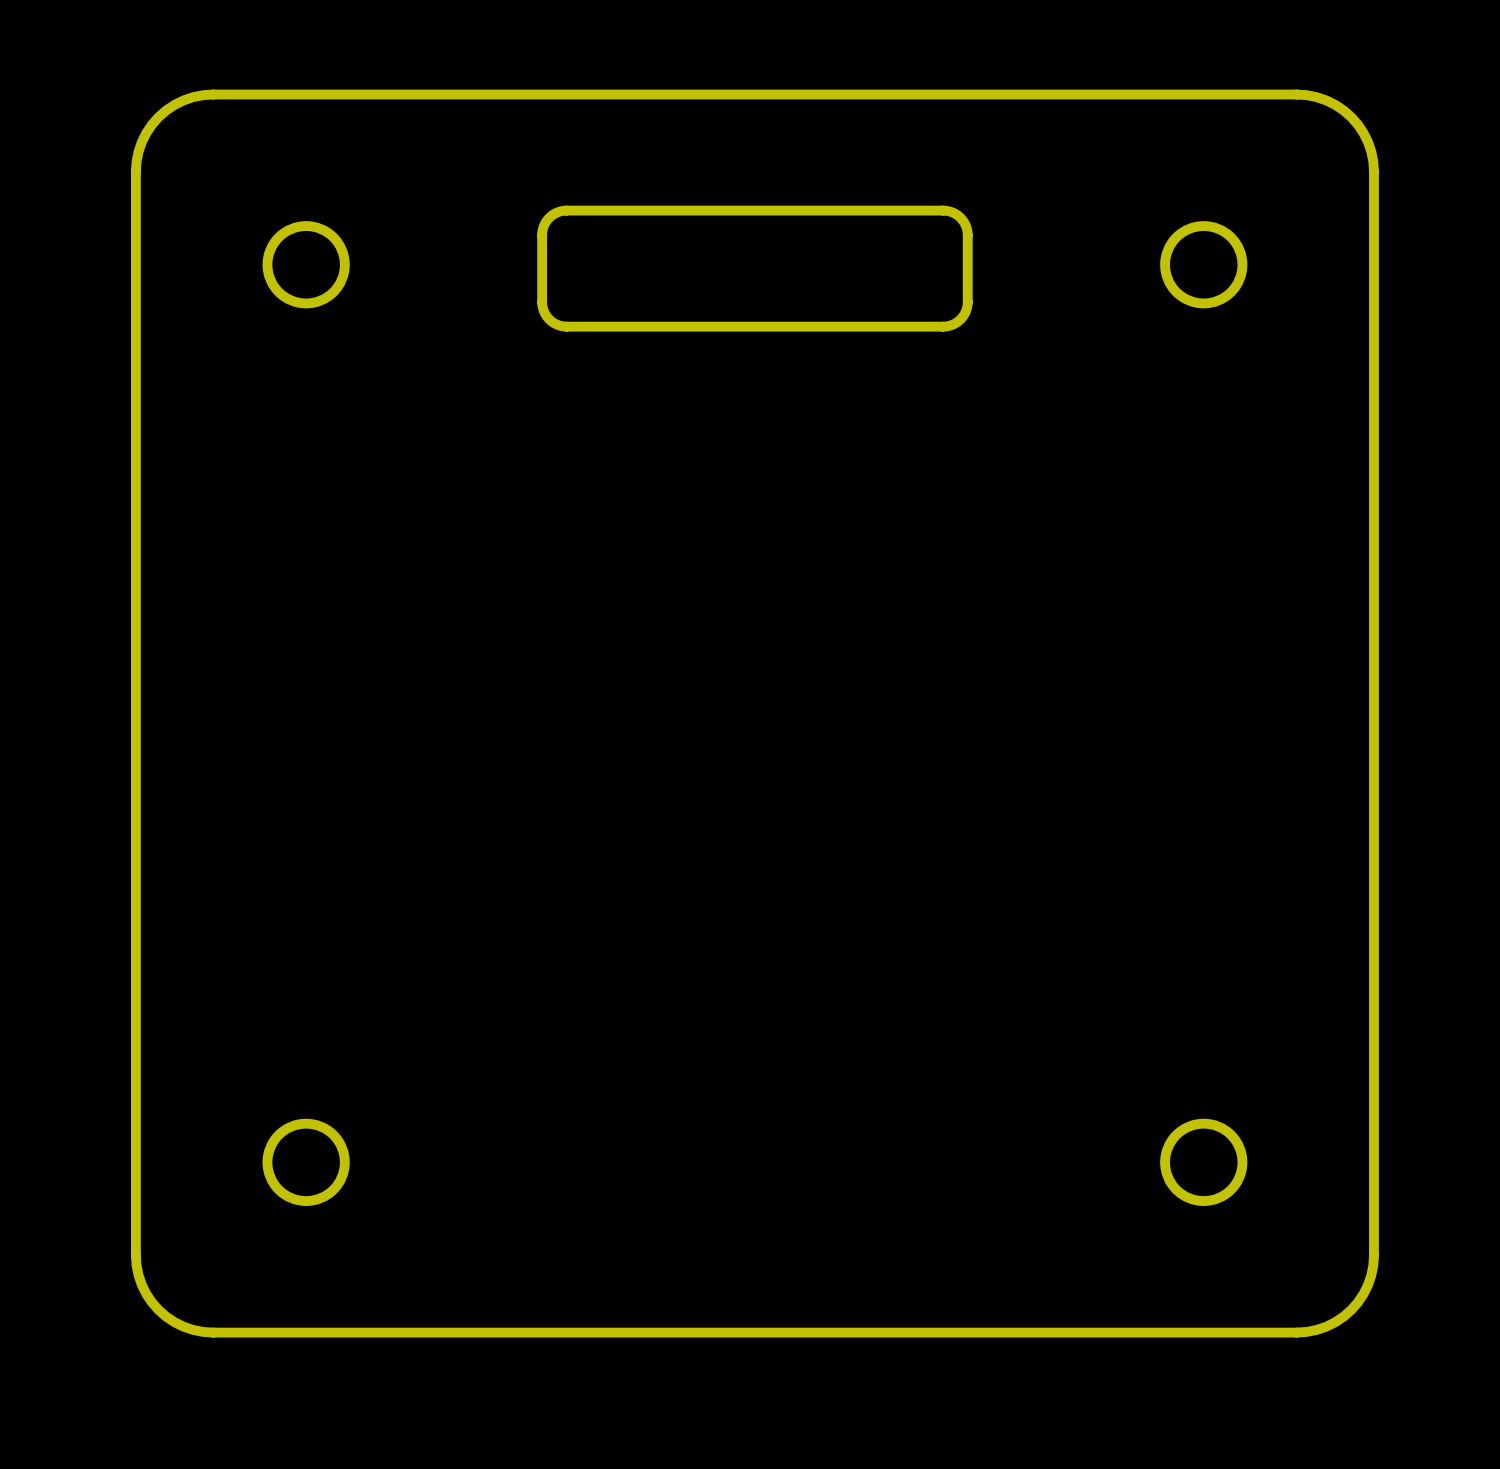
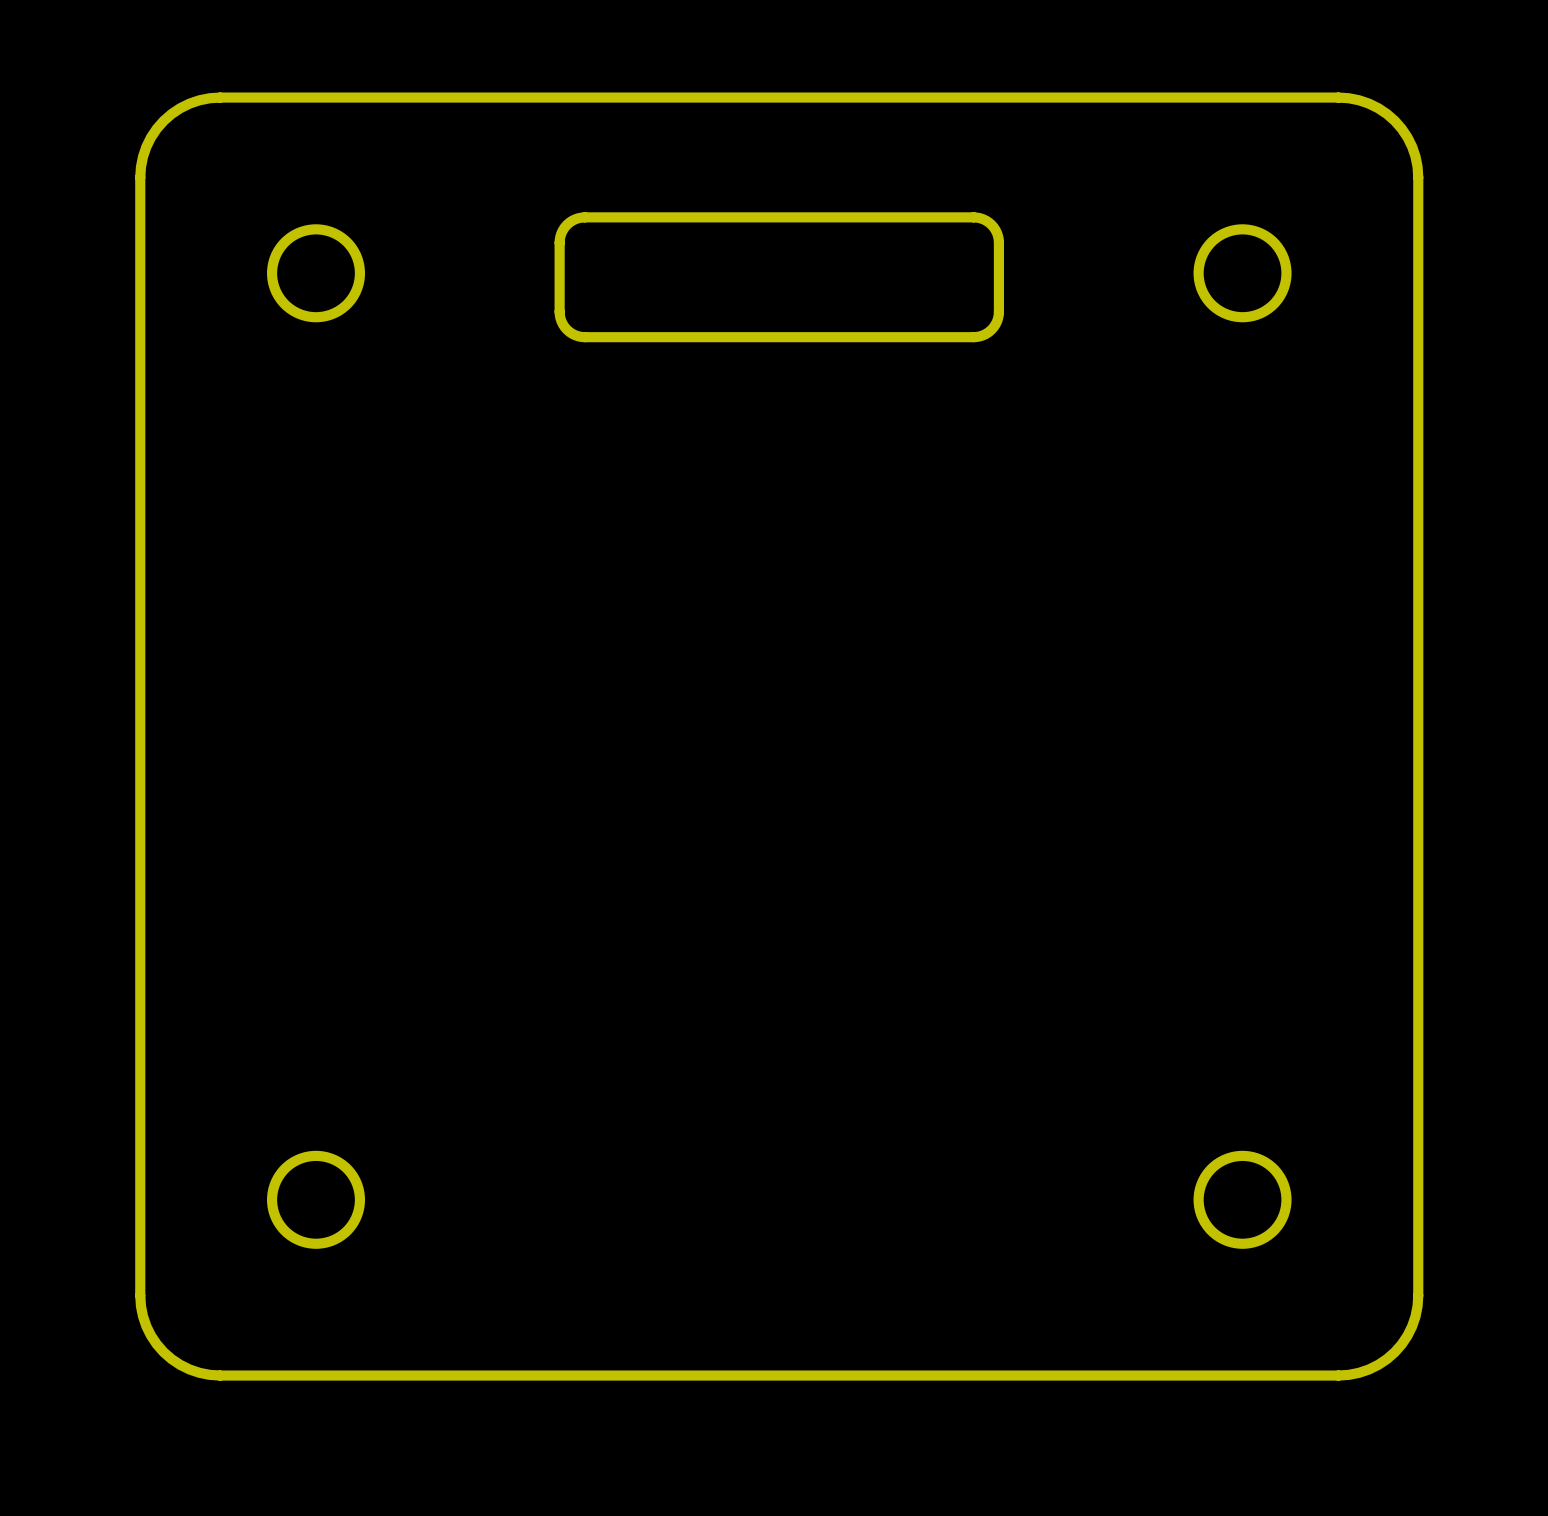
round board edge: none -> [267, 224, 366, 323]
round board edge: none -> [1193, 224, 1292, 323]
round board edge: [262, 221, 350, 309] -> none
round board edge: [1160, 221, 1248, 309] -> none
round board edge: none -> [267, 1150, 366, 1249]
round board edge: none -> [1193, 1150, 1292, 1249]
round board edge: [262, 1118, 350, 1206] -> none
round board edge: [1160, 1118, 1248, 1206] -> none

